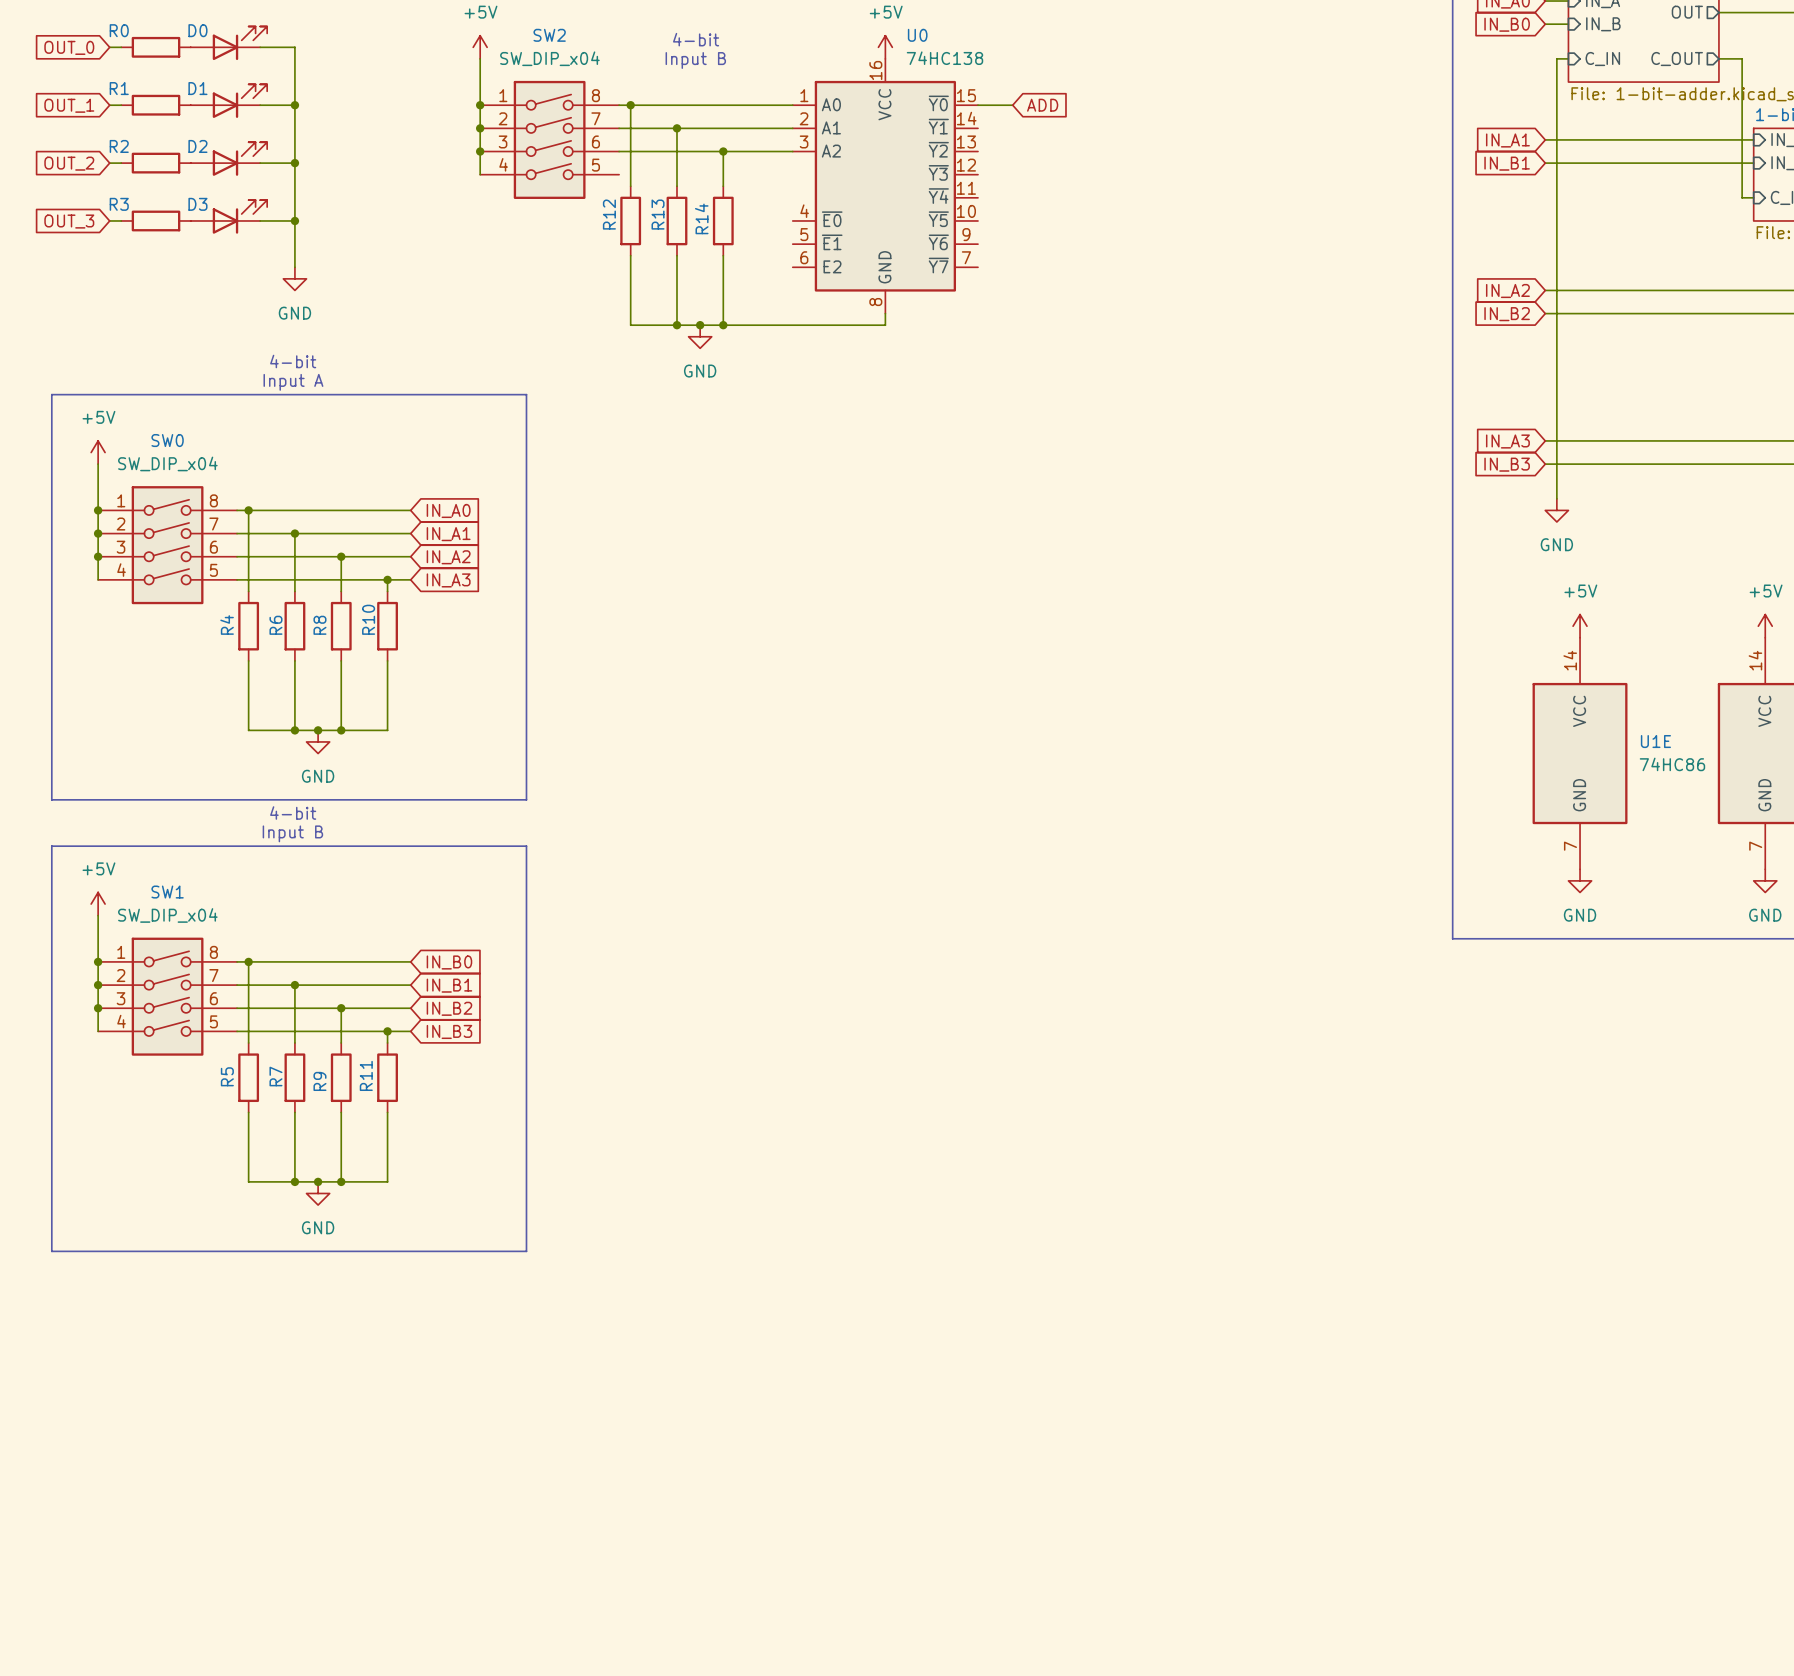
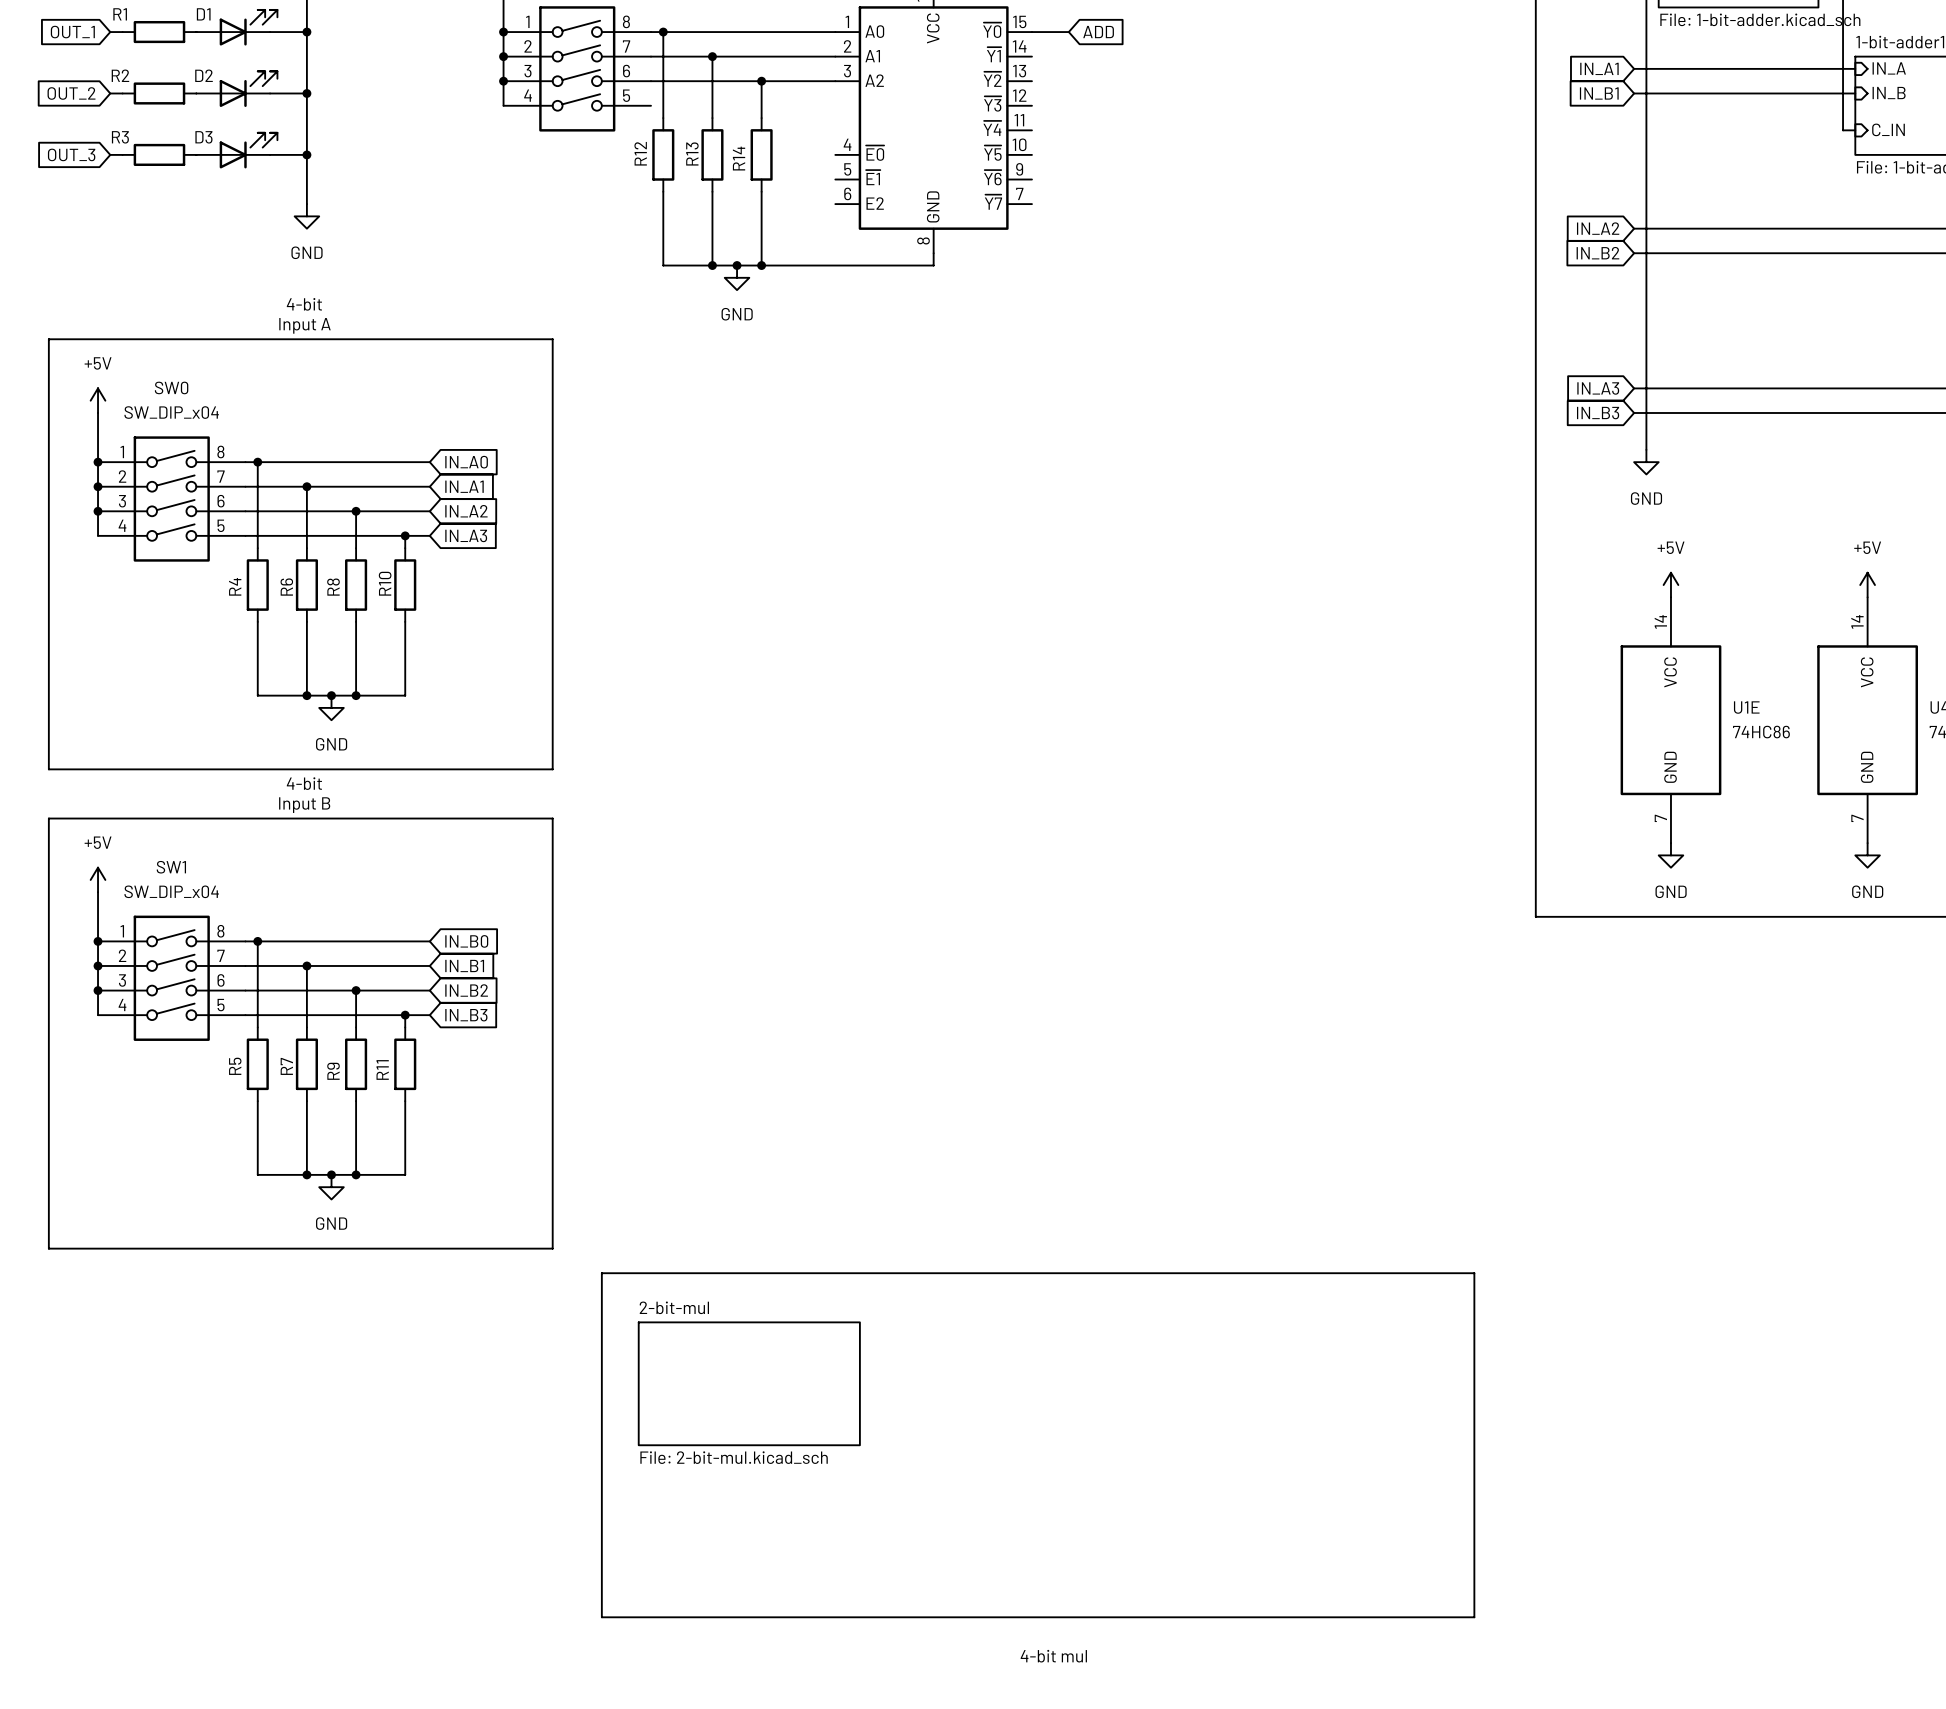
line: none -> (601, 1273) (1474, 1273) (1474, 1617) (601, 1617) (601, 1273)
sheet 2-bit-mul: none -> File: 2-bit-mul.kicad_sch (749, 1383)
text: none -> 4-bit mul (1053, 1656)

